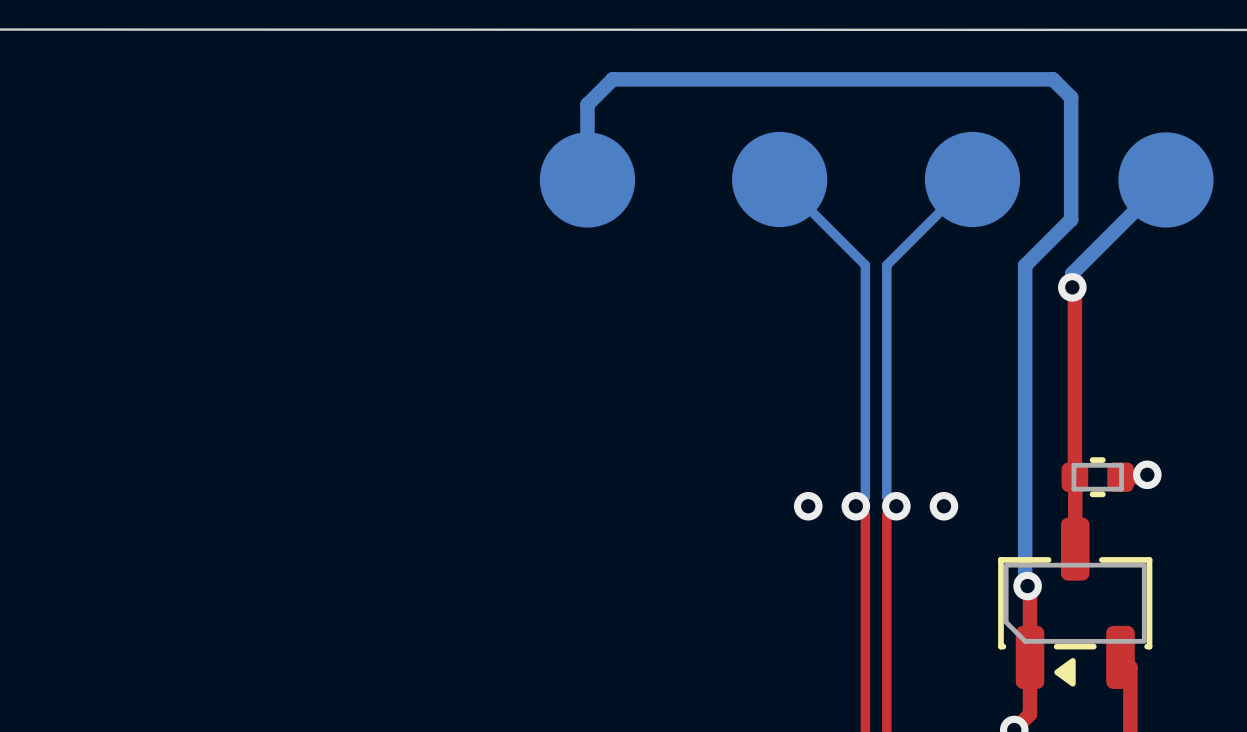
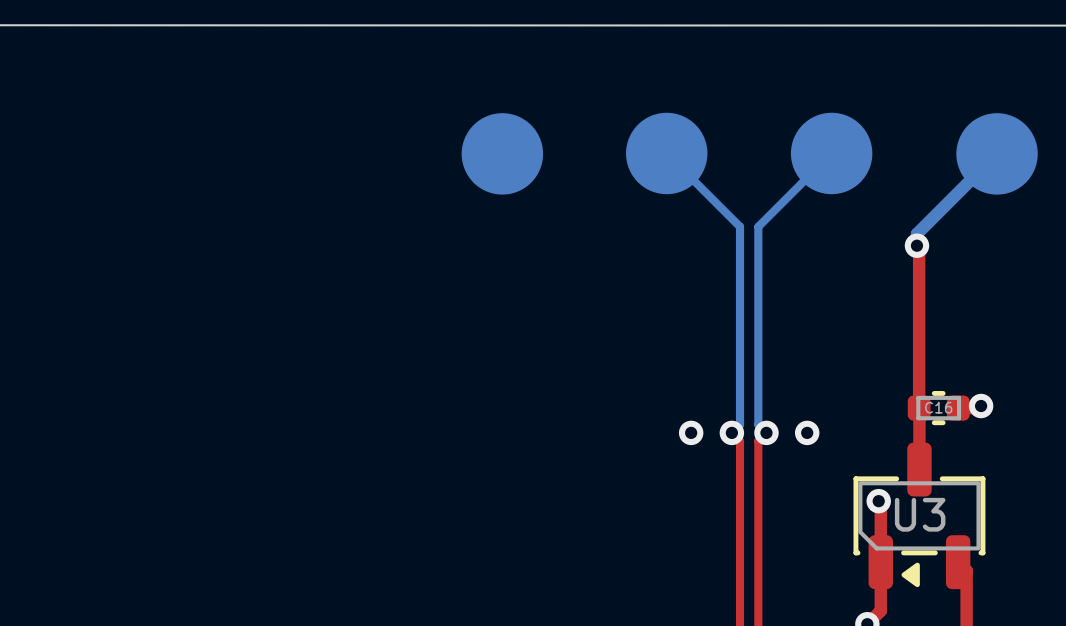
bottom track: (587, 179) (587, 104) (612, 79) (1052, 79) (1071, 97) (1071, 219) (1025, 265) (1025, 583) -> none
C16 name: none -> C16 (938, 407)
U3 name: none -> U3 (920, 514)

